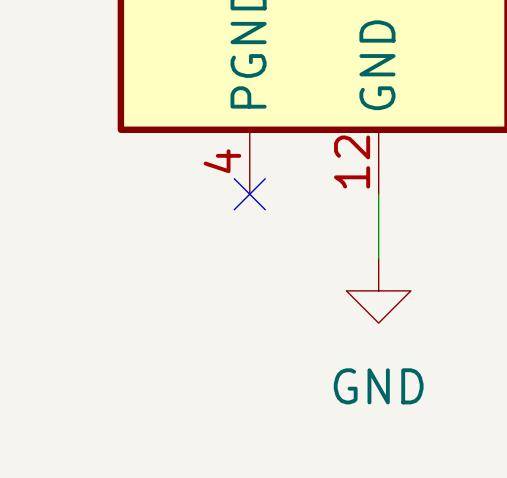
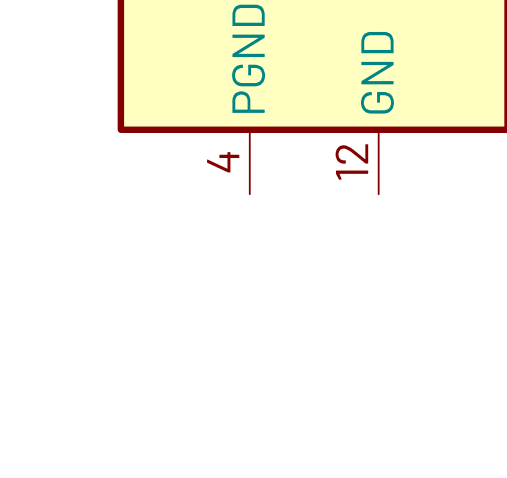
no-connect mark: (249, 194) -> none
wire: (378, 194) (378, 258) -> none
power symbol: GND (378, 290) -> none

